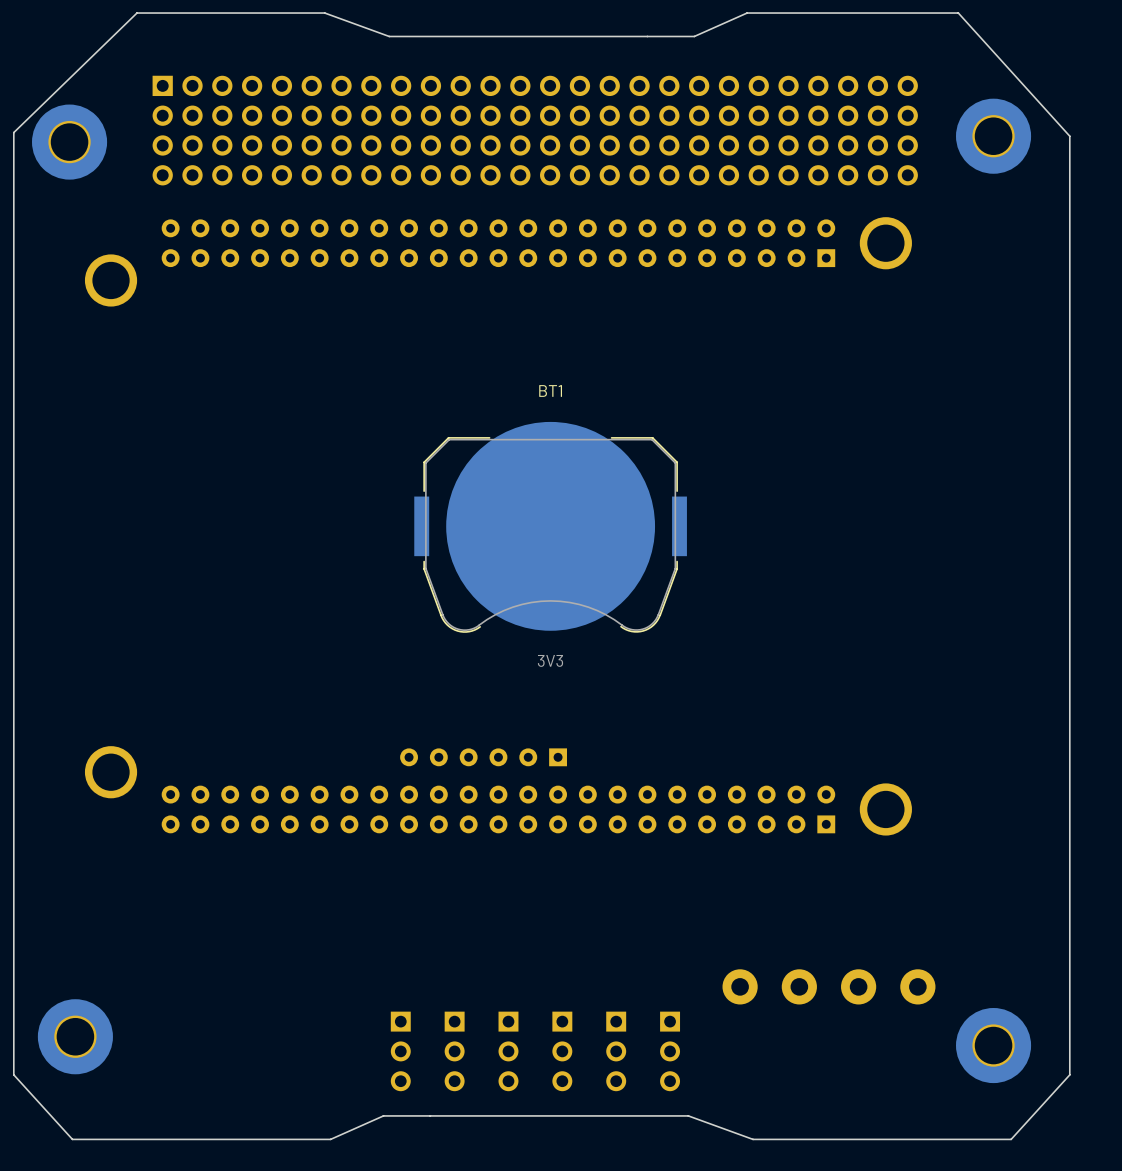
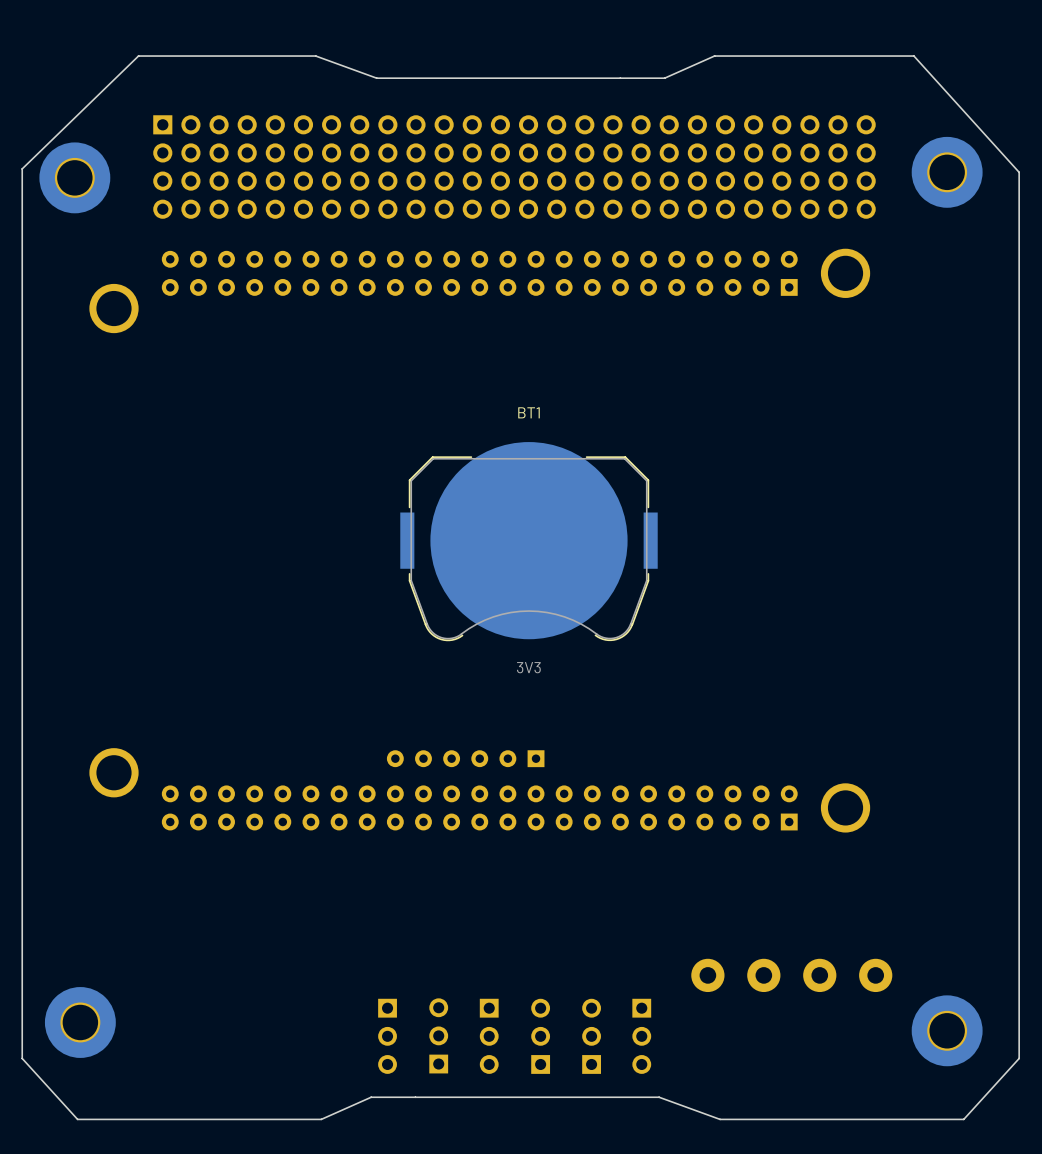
part rotation: 0° (454, 1051) -> 180° (438, 1035)
part rotation: 0° (562, 1051) -> 180° (540, 1036)
part rotation: 0° (616, 1051) -> 180° (591, 1036)

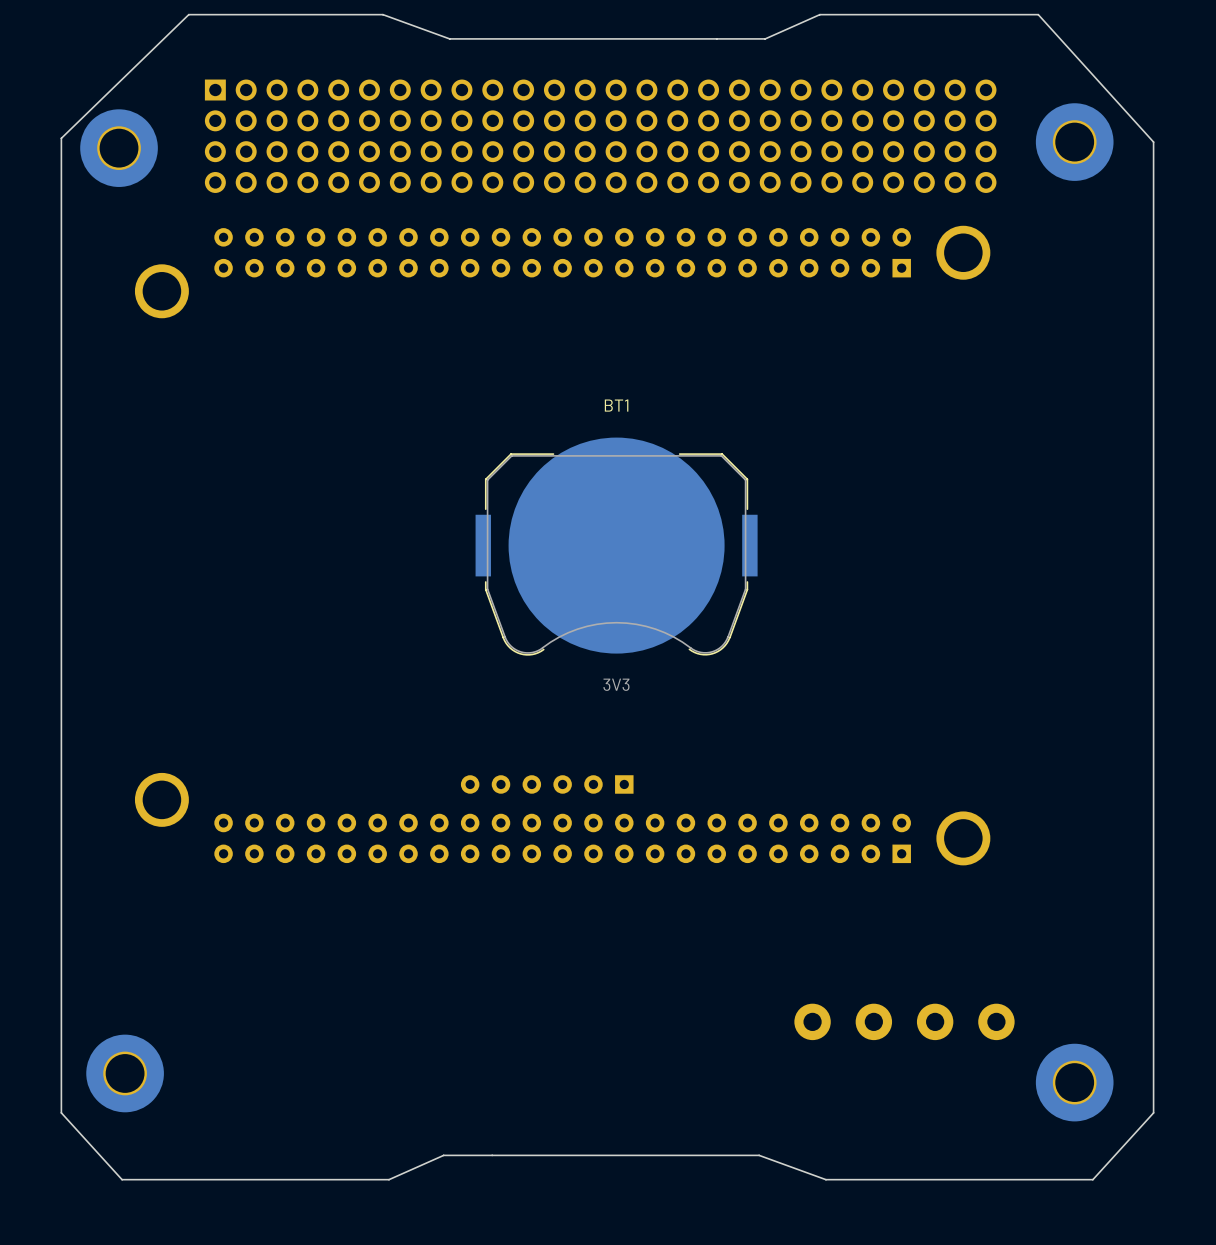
part: (438, 1035) -> none
part: (387, 1036) -> none
part: (489, 1036) -> none
part: (540, 1036) -> none
part: (591, 1036) -> none
part: (641, 1036) -> none

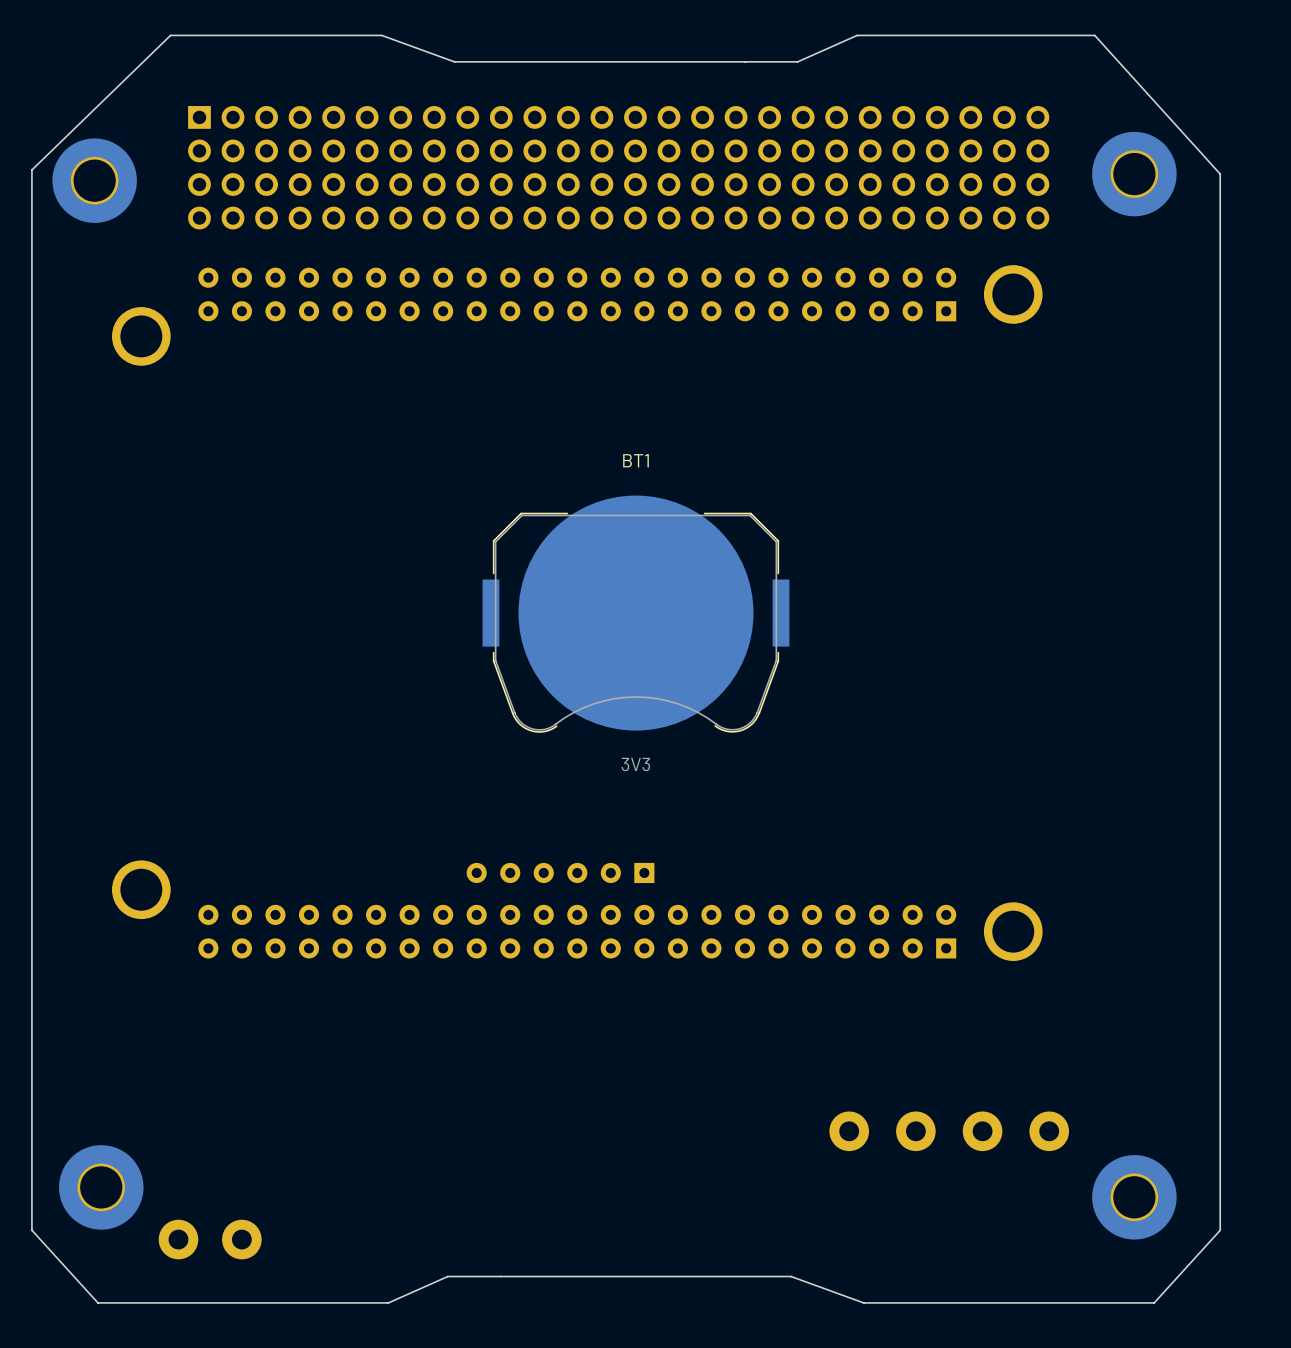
part: none -> (178, 1239)
part: none -> (241, 1239)

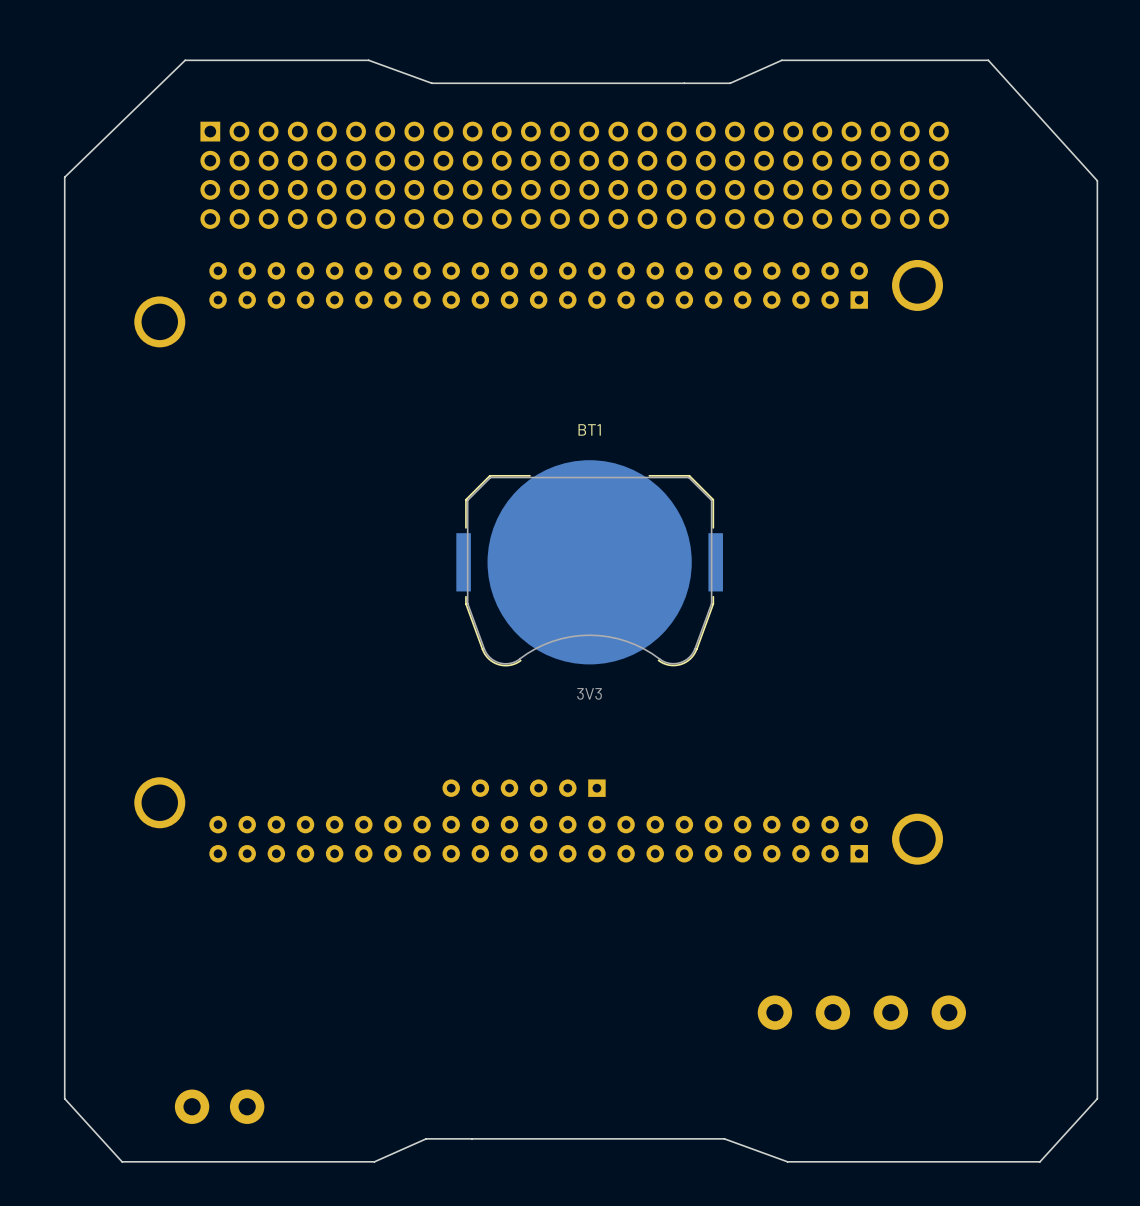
part: (1134, 174) -> none
part: (94, 180) -> none
part: (101, 1187) -> none
part: (1134, 1197) -> none

